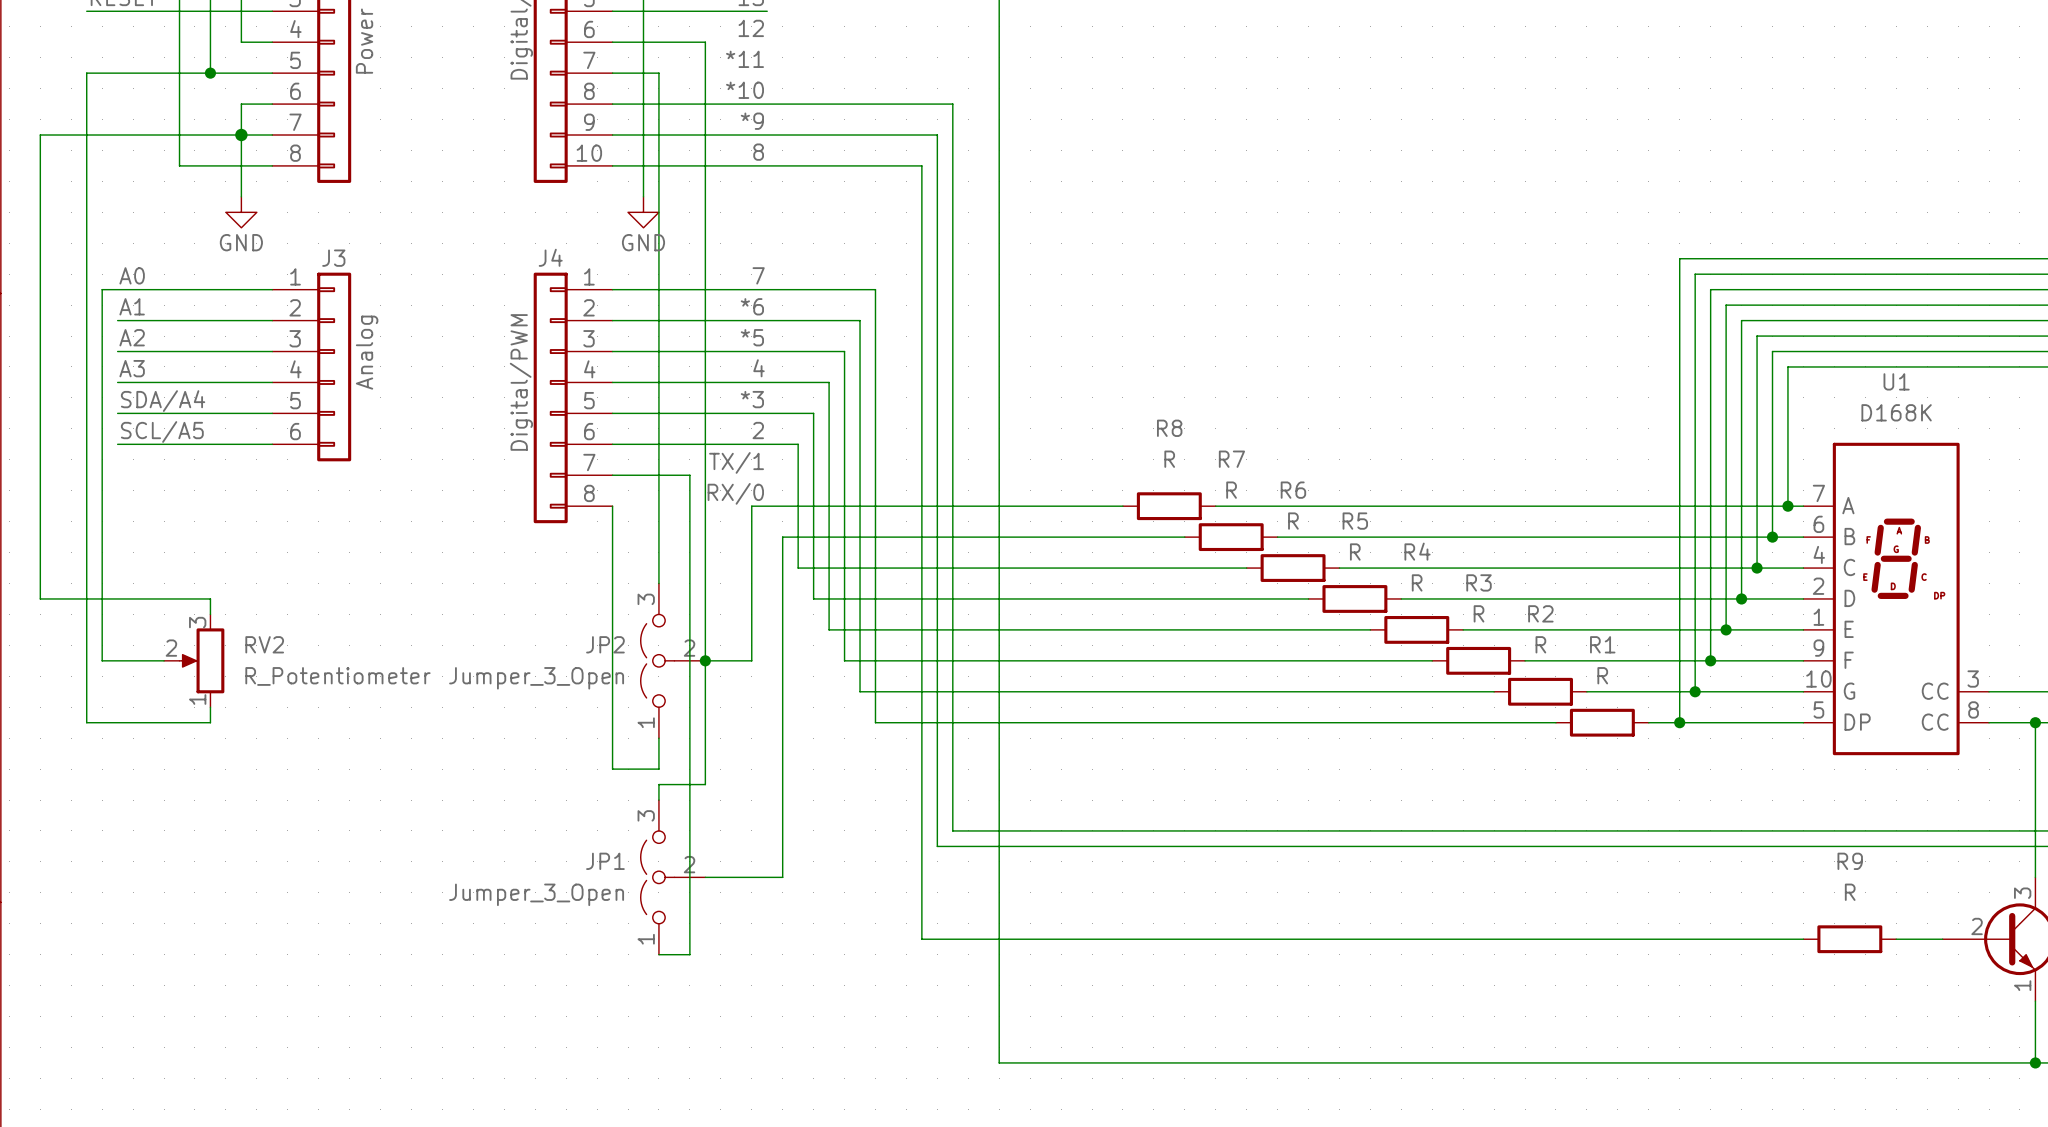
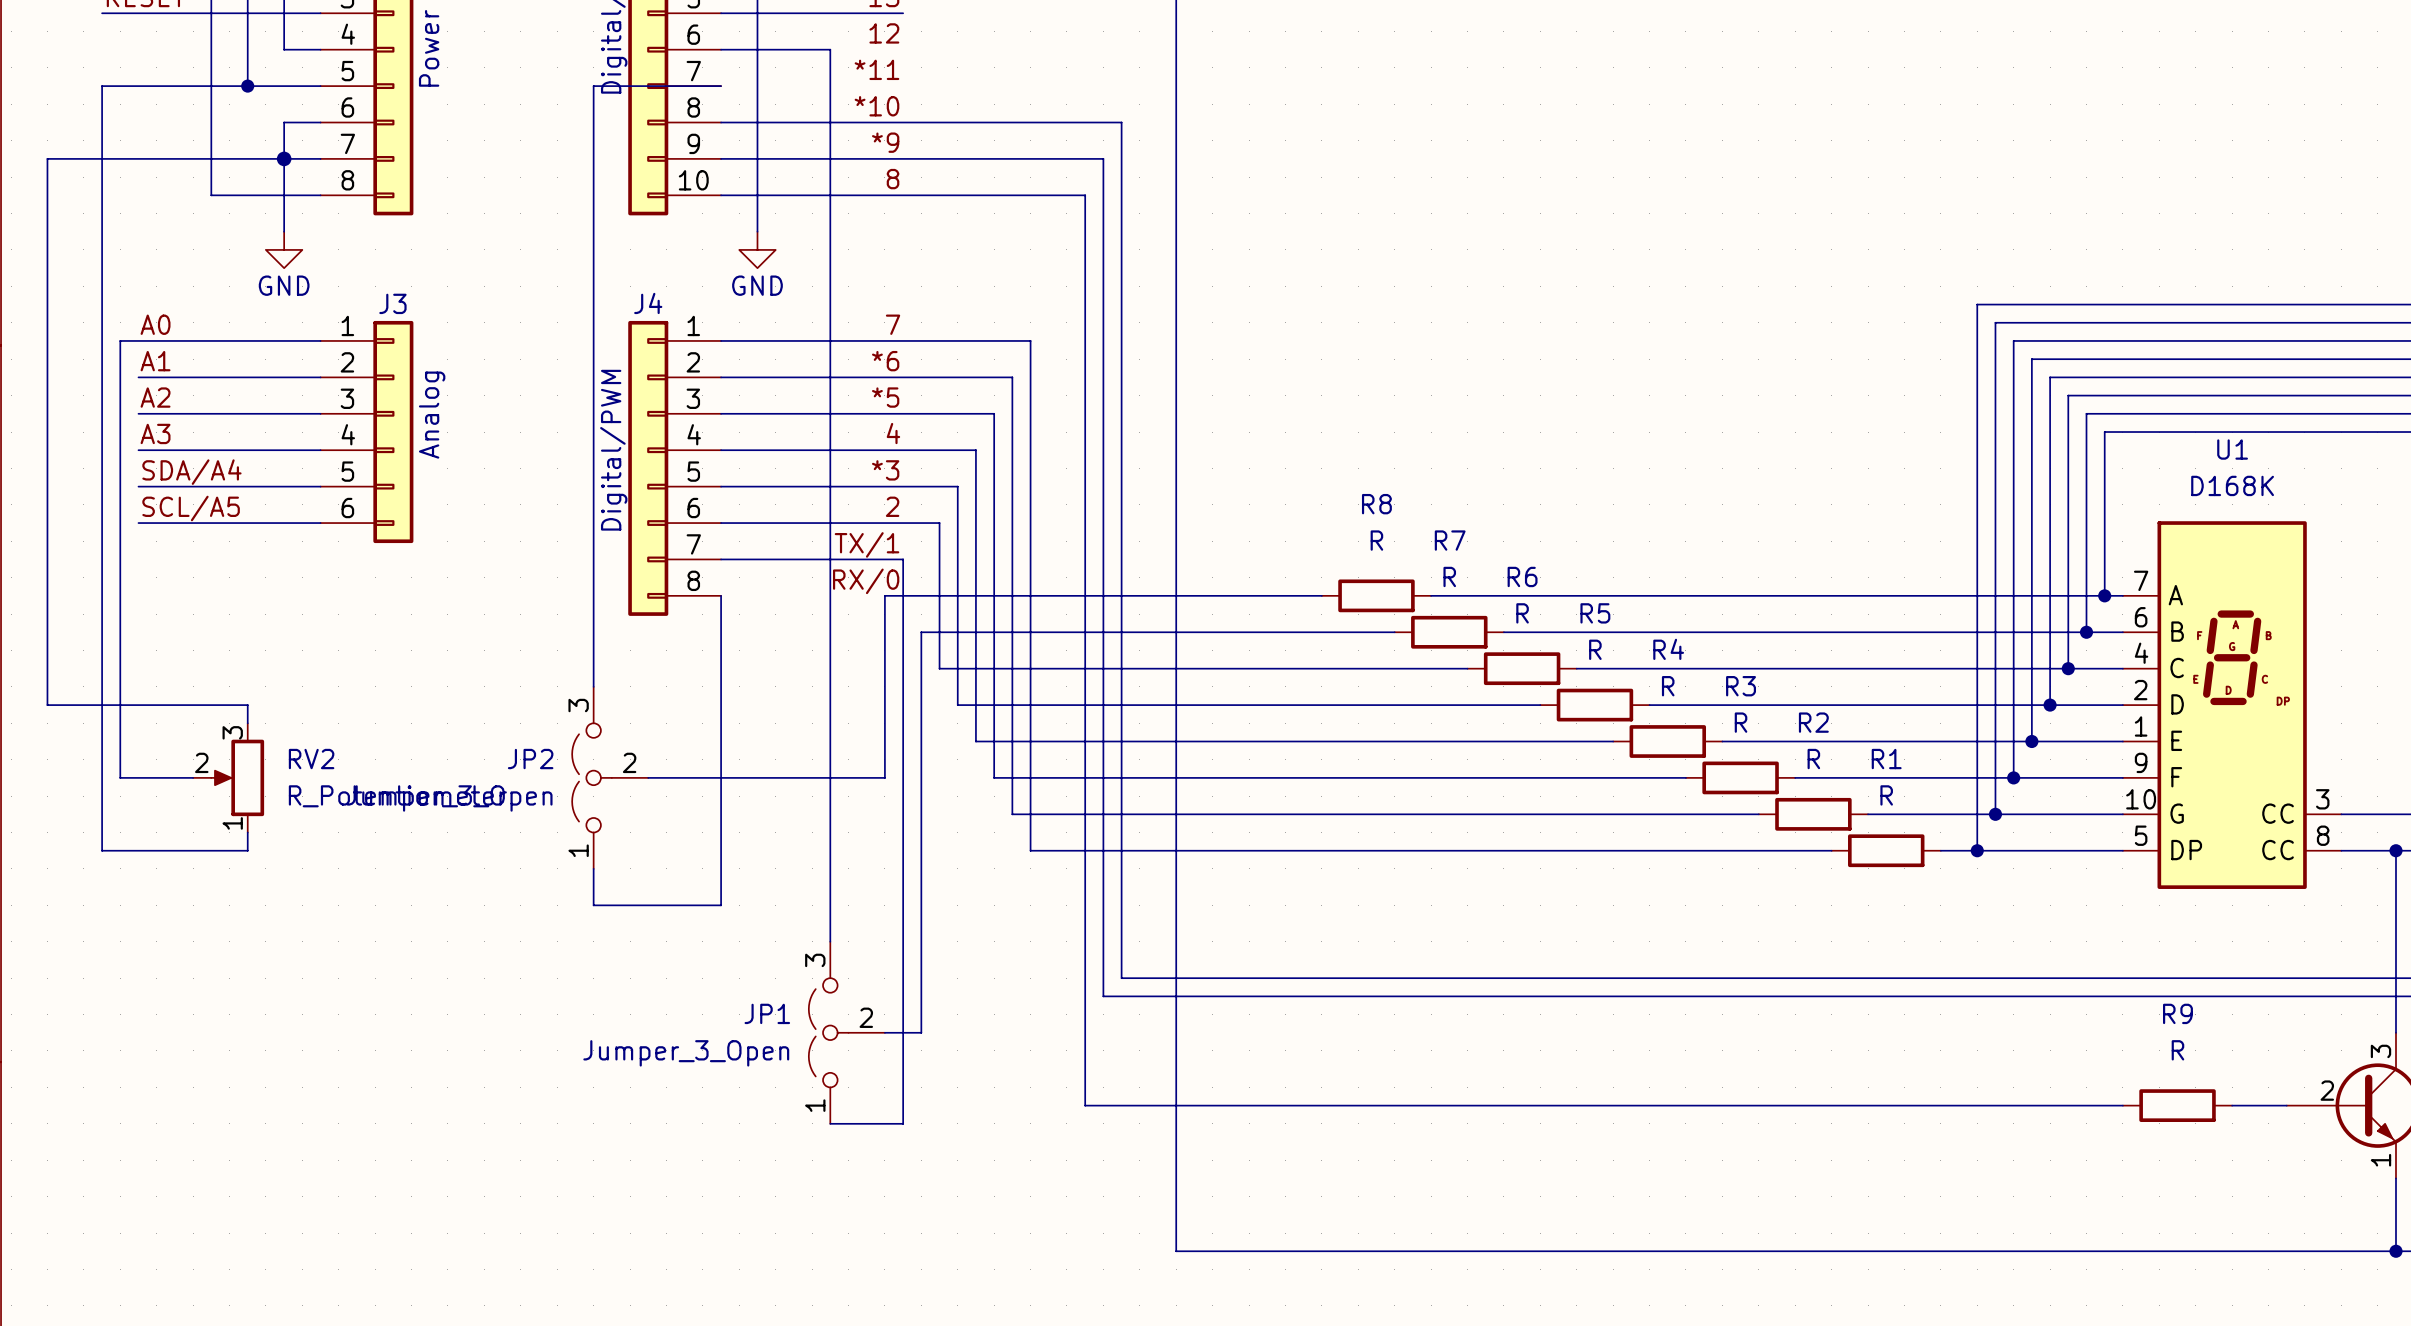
wire: (612, 73) (658, 73) (658, 583) -> (721, 86) (593, 86) (593, 686)
wire: (689, 475) (689, 954) (658, 954) -> (812, 559) (903, 559) (903, 1123) (830, 1123)
wire: none -> (648, 777) (830, 777)
JP2 position: (673, 660) -> (610, 777)
junction: (705, 660) -> none
wire: (658, 738) (658, 769) (612, 769) -> (593, 868) (593, 905) (721, 905)
wire: (705, 784) (658, 784) (658, 800) -> (830, 923) (830, 941)
JP1 position: (673, 877) -> (846, 1032)

